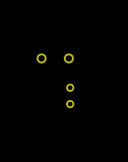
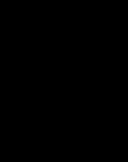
part: (55, 58) -> none
part: (70, 95) -> none

